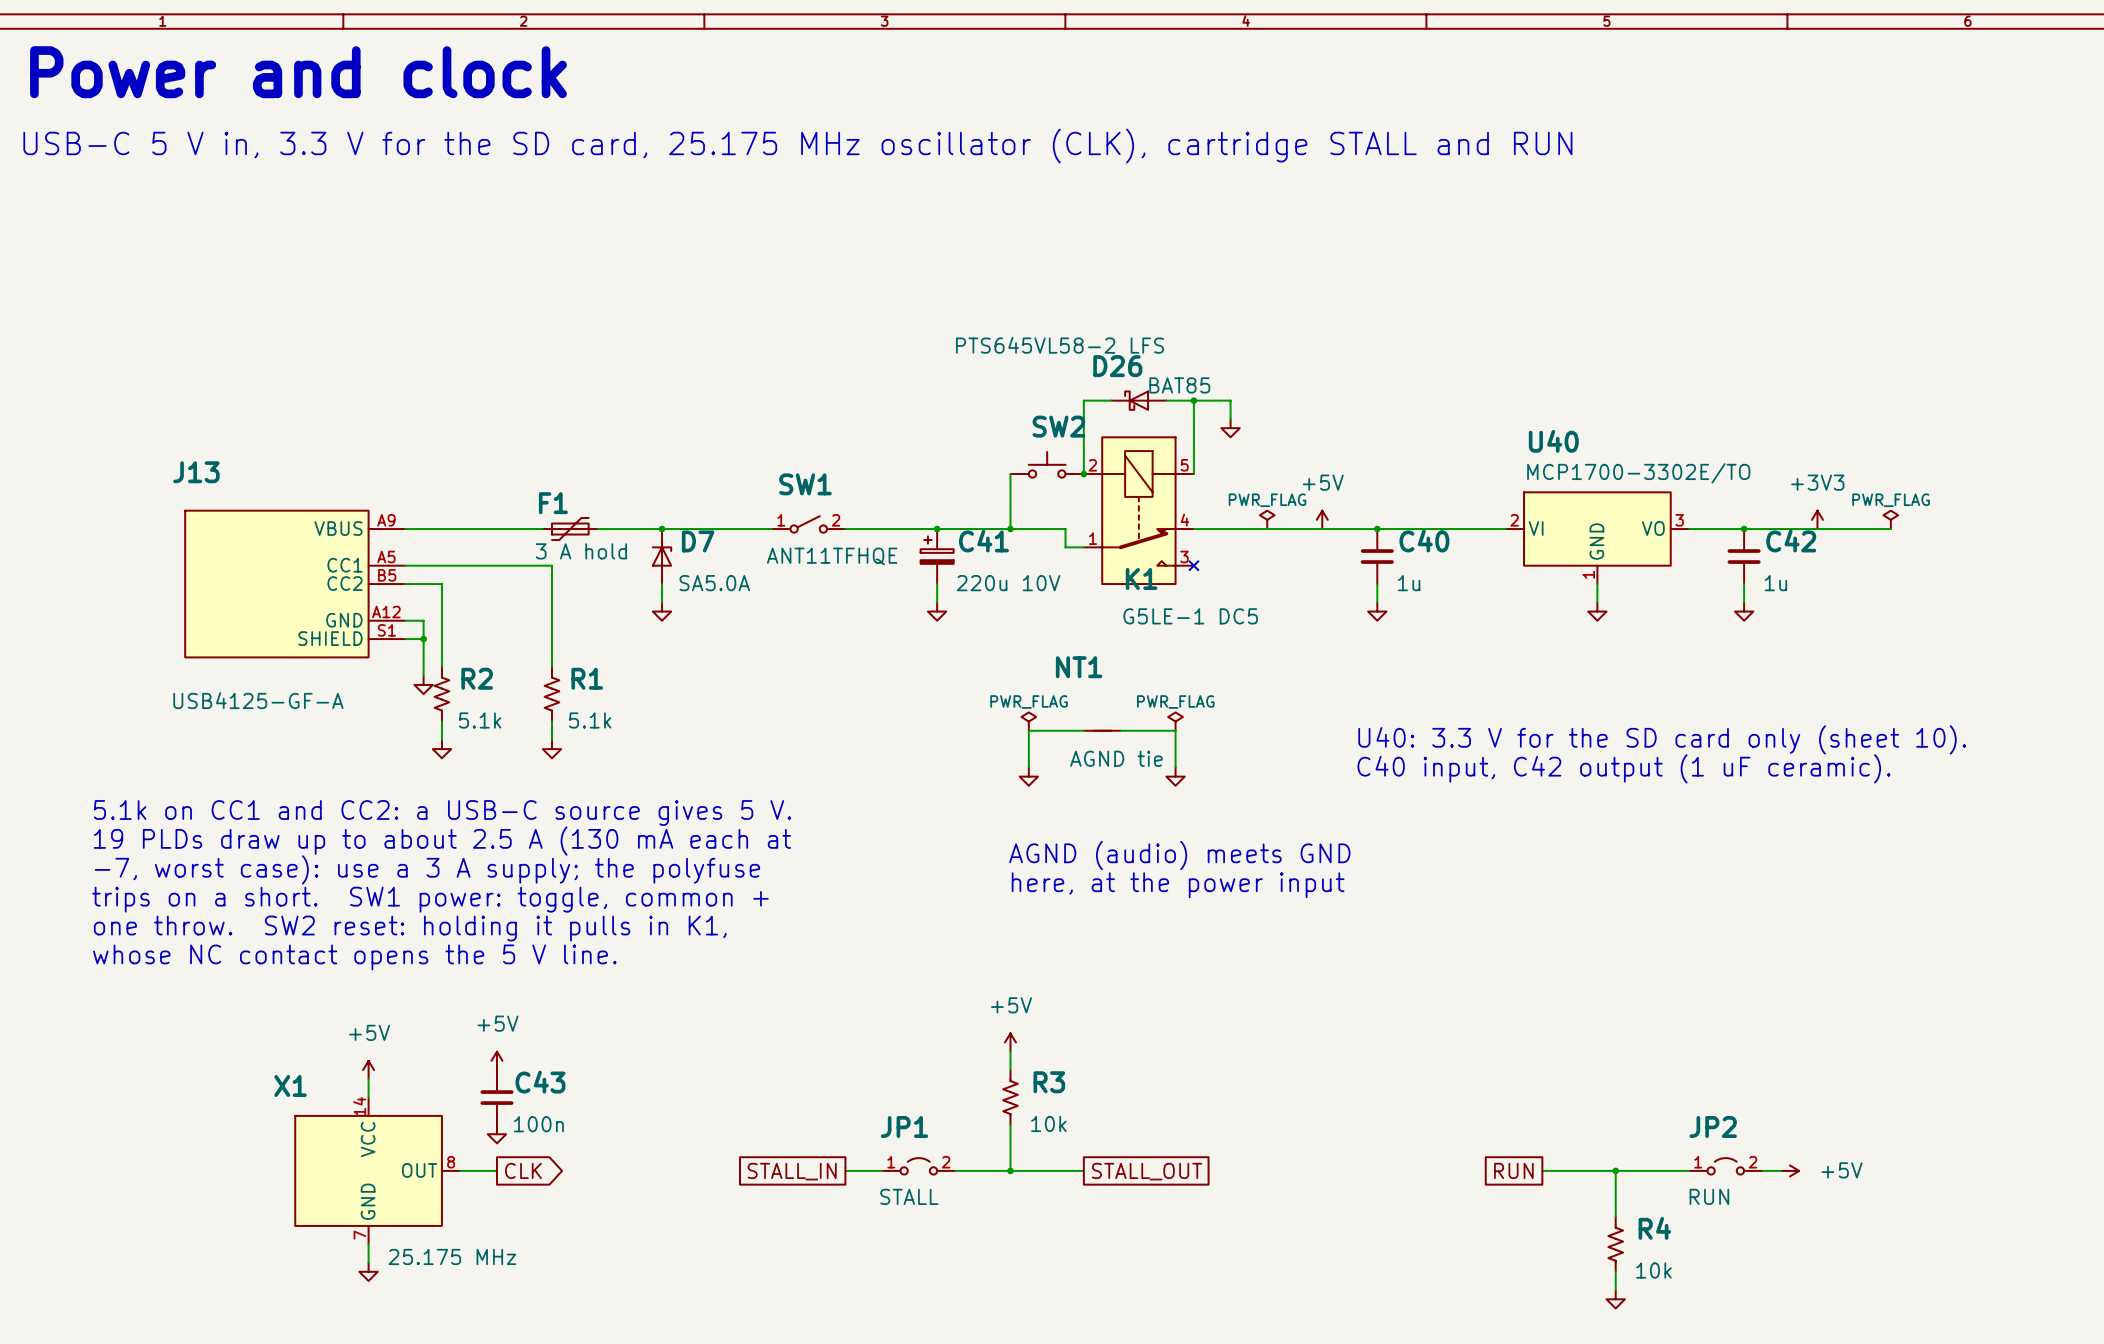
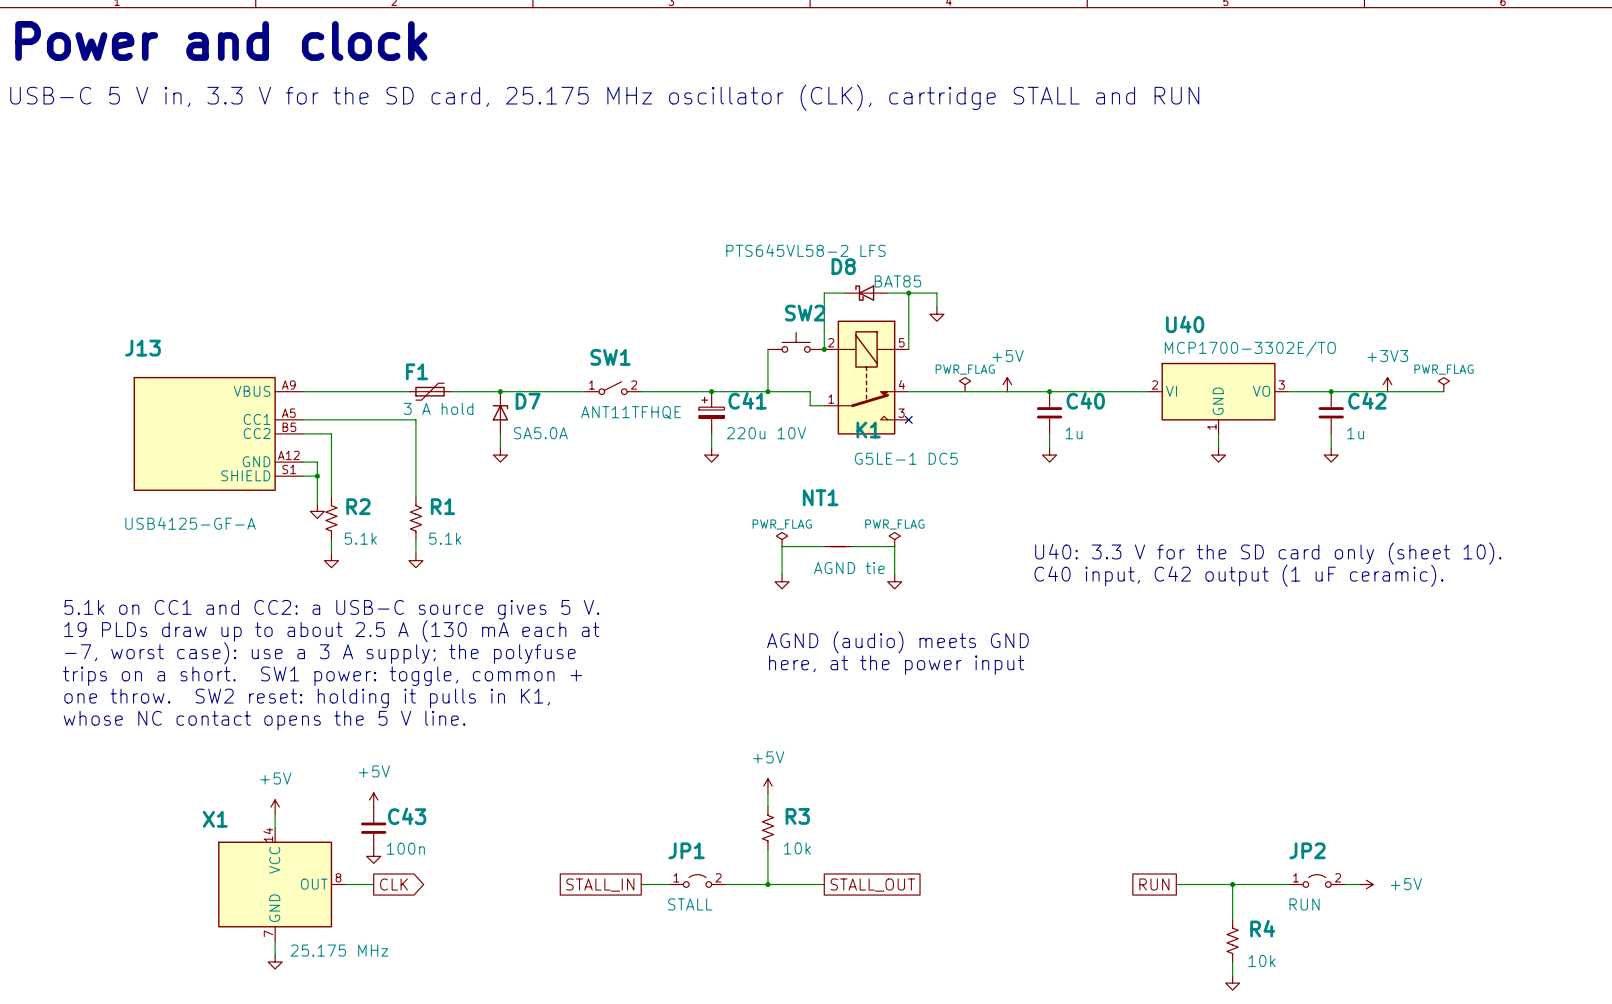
D26 name: D26 (1117, 366) -> D8 (843, 266)

